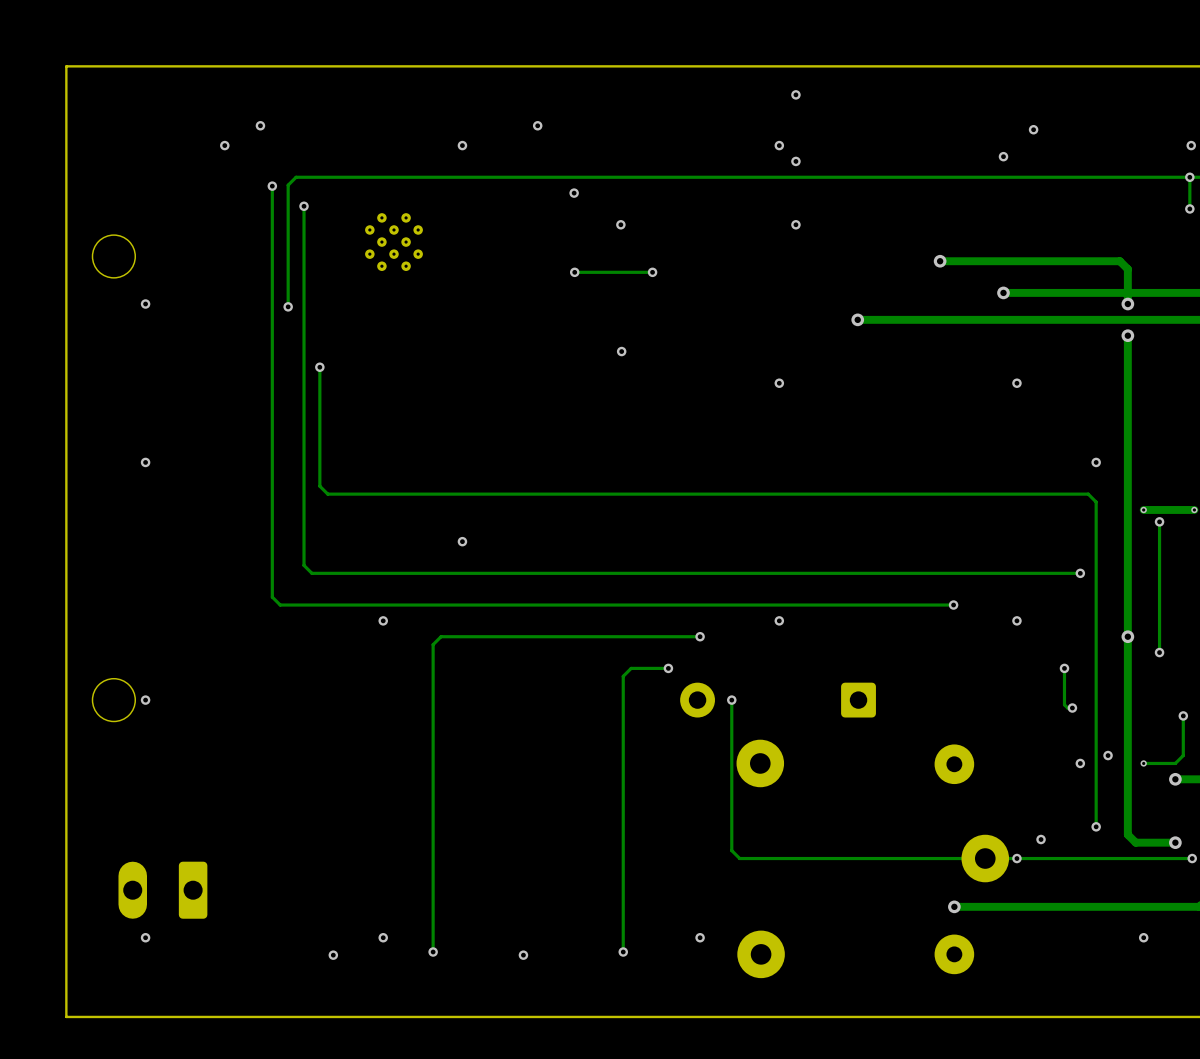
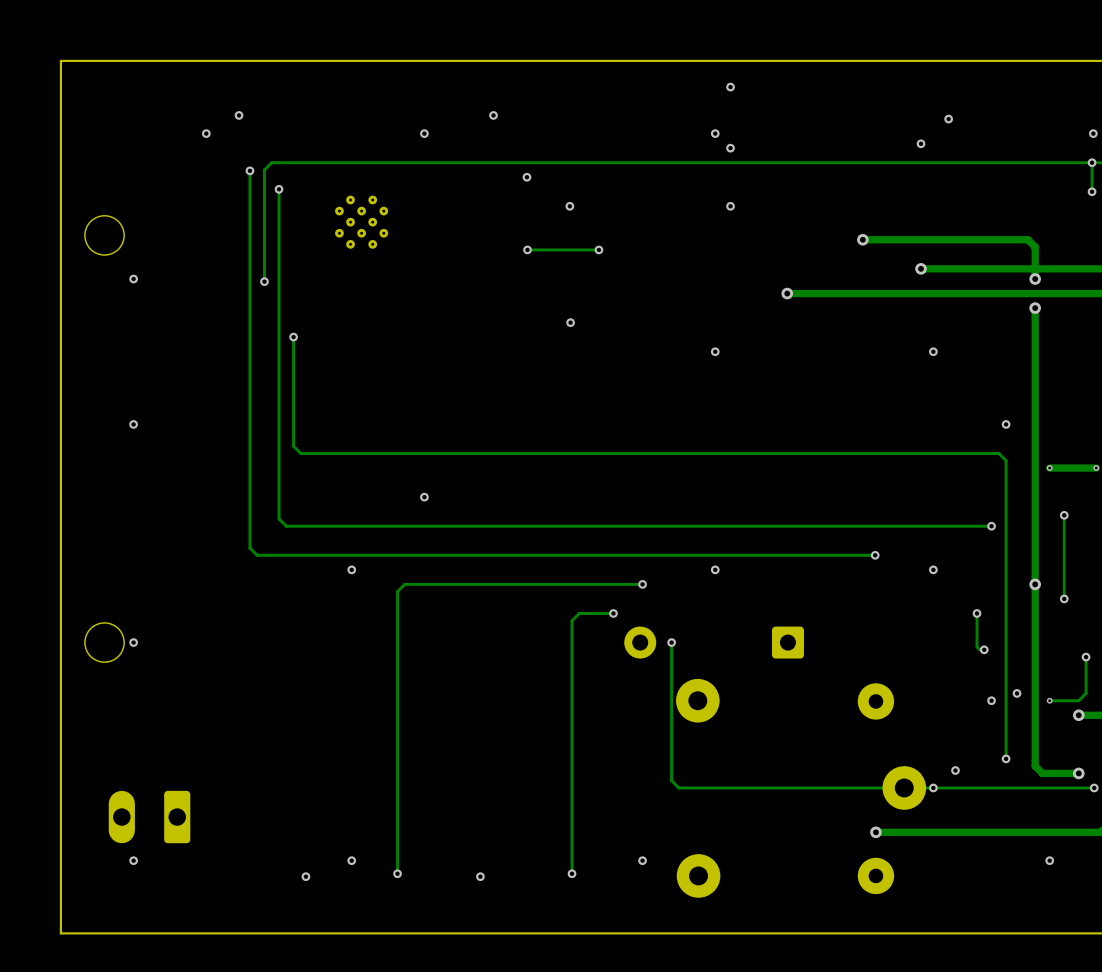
track: (1159, 521) (1159, 561) -> none
via position: (1159, 521) -> (1064, 515)

